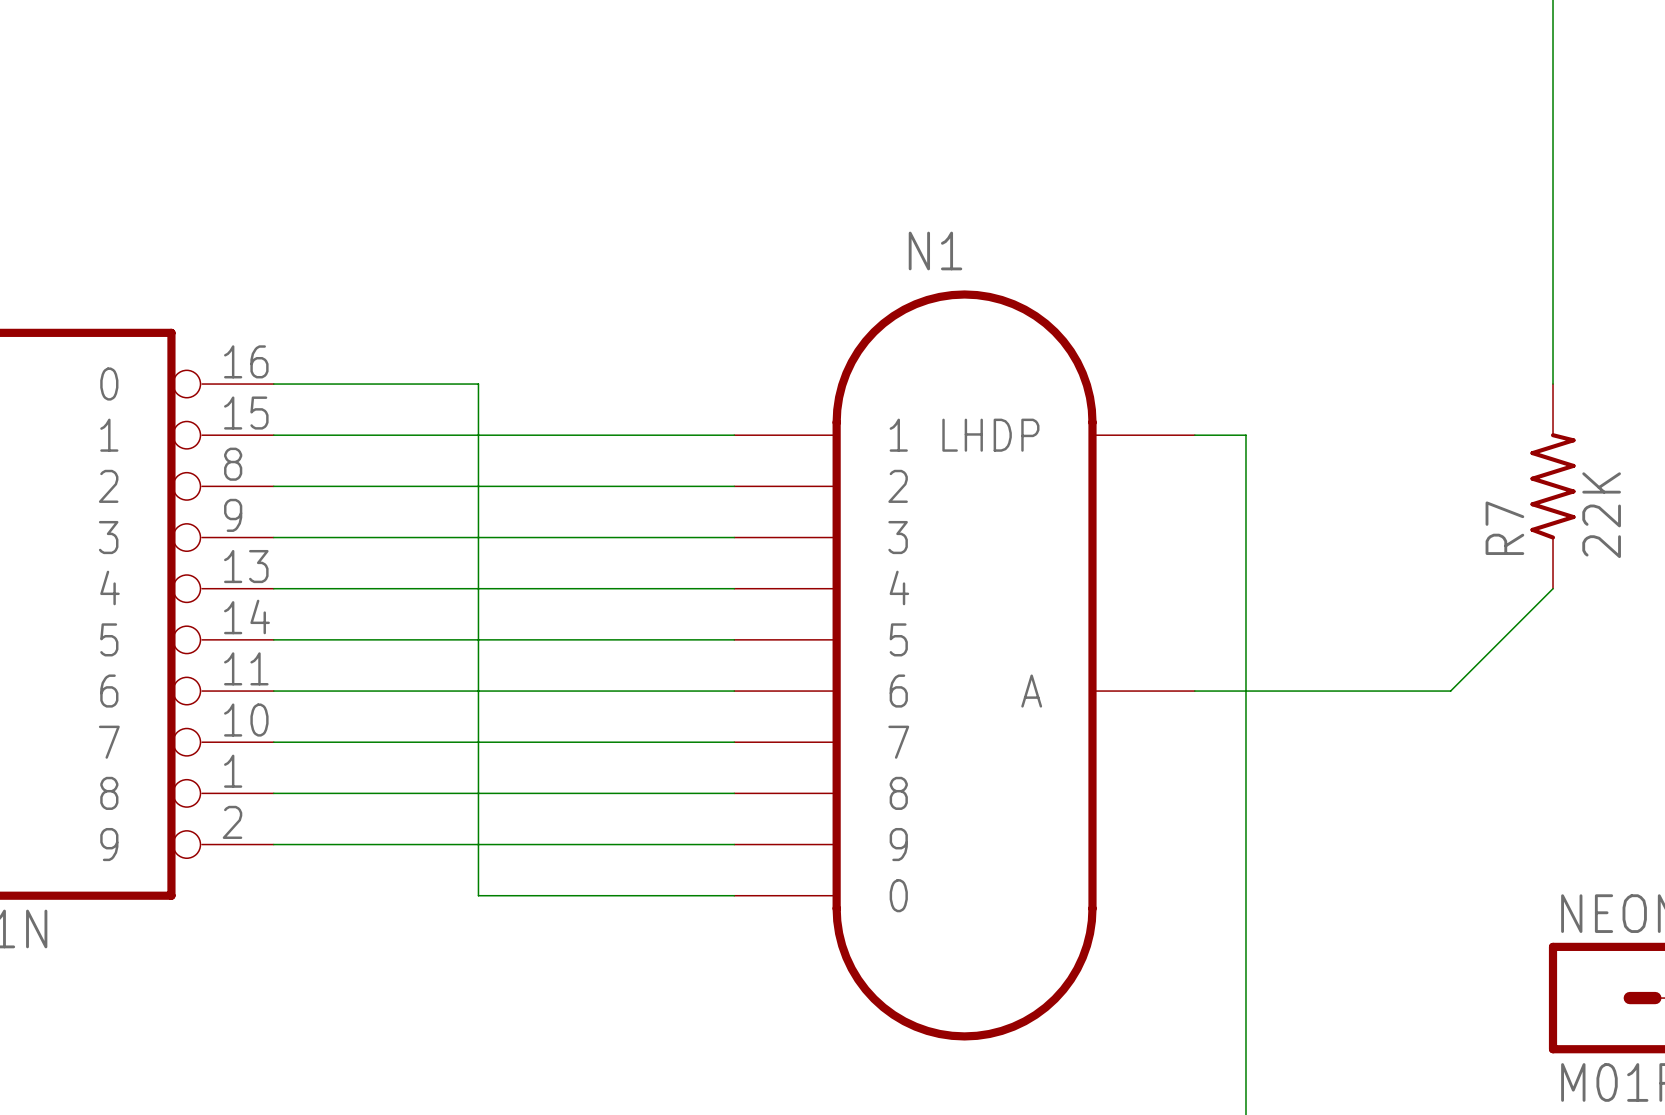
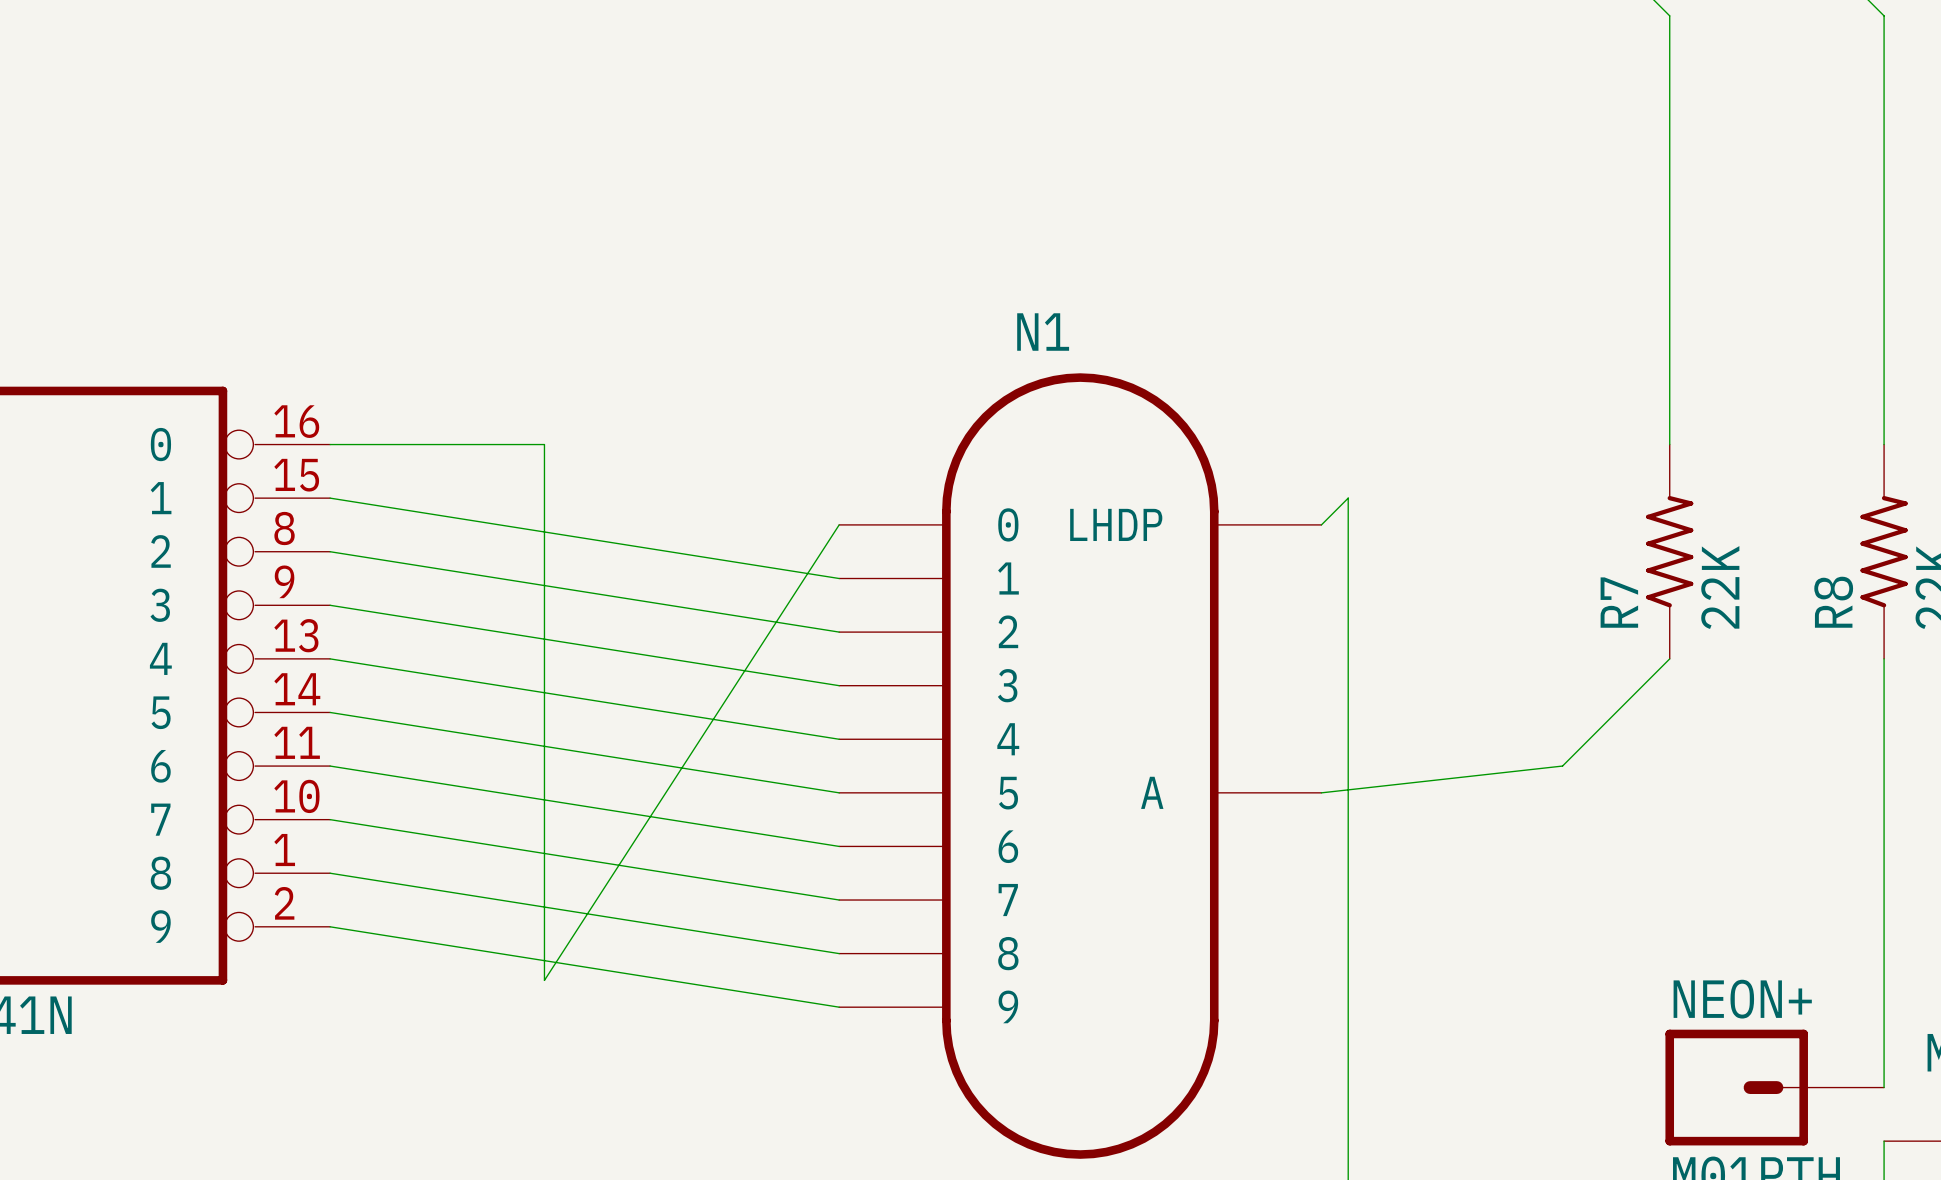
N1 symbol: [734, 290, 1195, 1041] -> [839, 373, 1322, 1159]
wire: (273, 435) (734, 435) -> (330, 498) (839, 578)
wire: (1194, 435) (1245, 435) -> (1321, 524) (1348, 498)
wire: (273, 486) (734, 486) -> (330, 551) (839, 632)
wire: (273, 537) (734, 537) -> (330, 605) (839, 685)
wire: (273, 588) (734, 588) -> (330, 658) (839, 739)
wire: (273, 639) (734, 639) -> (330, 712) (839, 792)
wire: (273, 691) (734, 691) -> (330, 766) (839, 846)
wire: (1194, 691) (1450, 691) -> (1321, 792) (1562, 766)
wire: (273, 742) (734, 742) -> (330, 819) (839, 900)
wire: (273, 793) (734, 793) -> (330, 873) (839, 953)
wire: (273, 844) (734, 844) -> (330, 926) (839, 1007)
wire: (478, 895) (734, 895) -> (544, 980) (839, 524)

